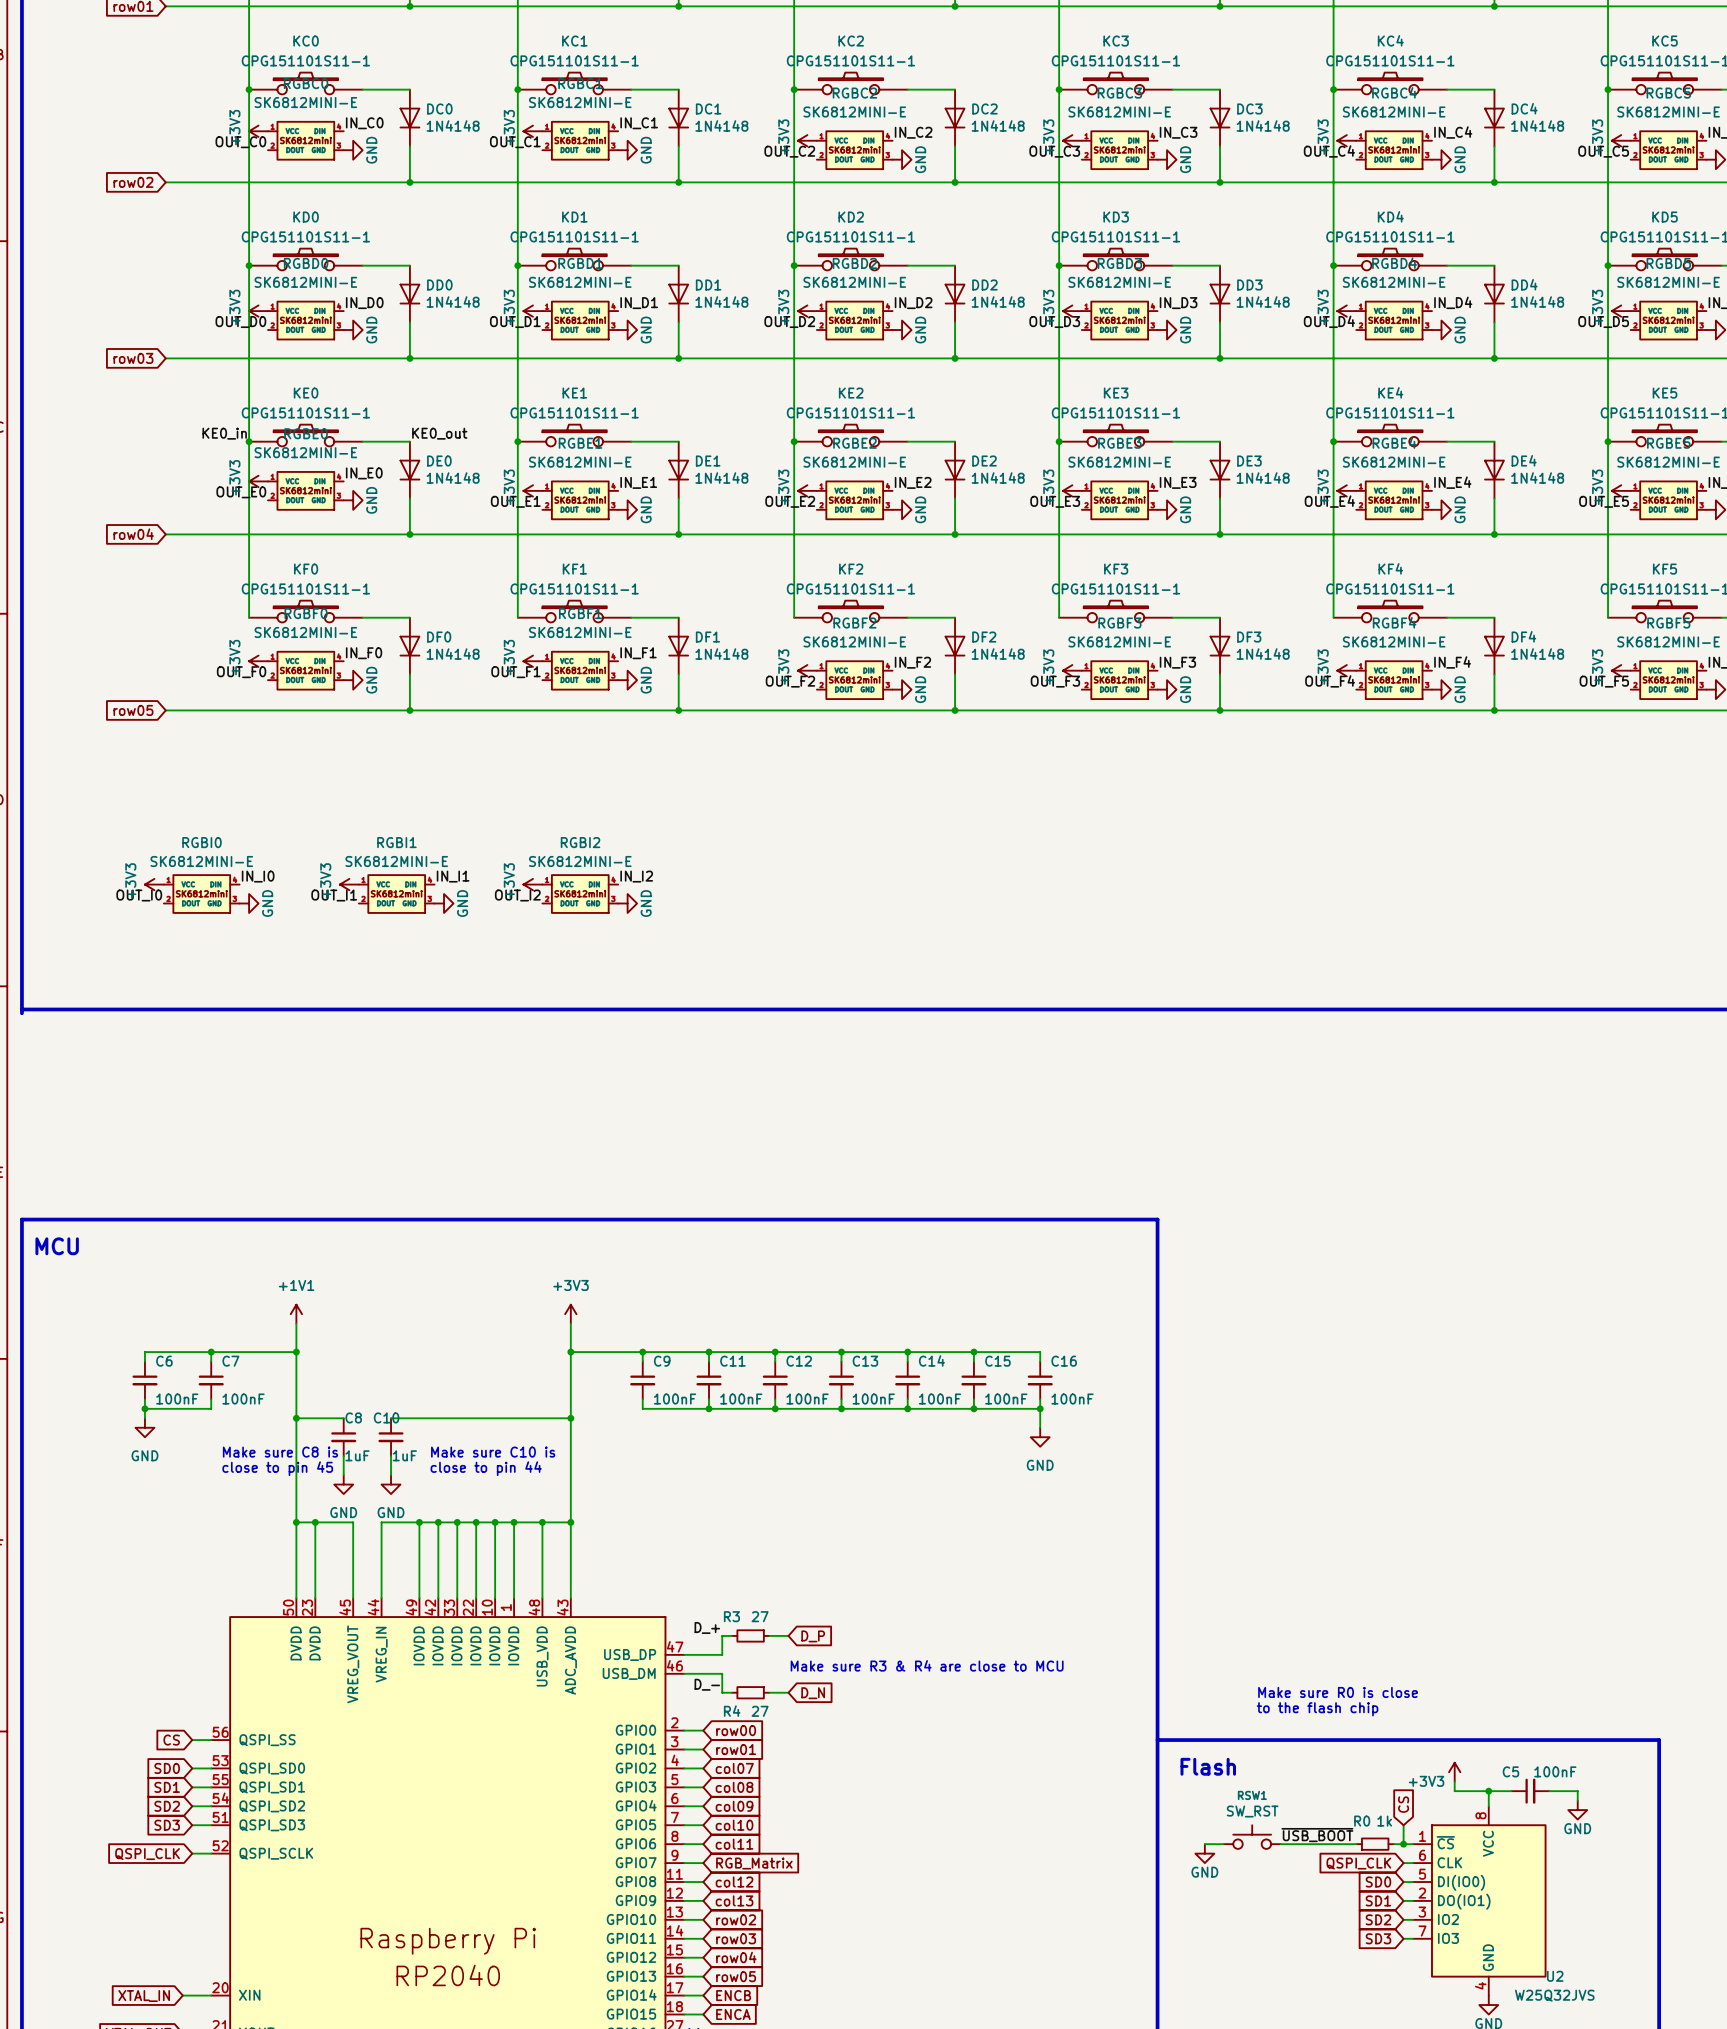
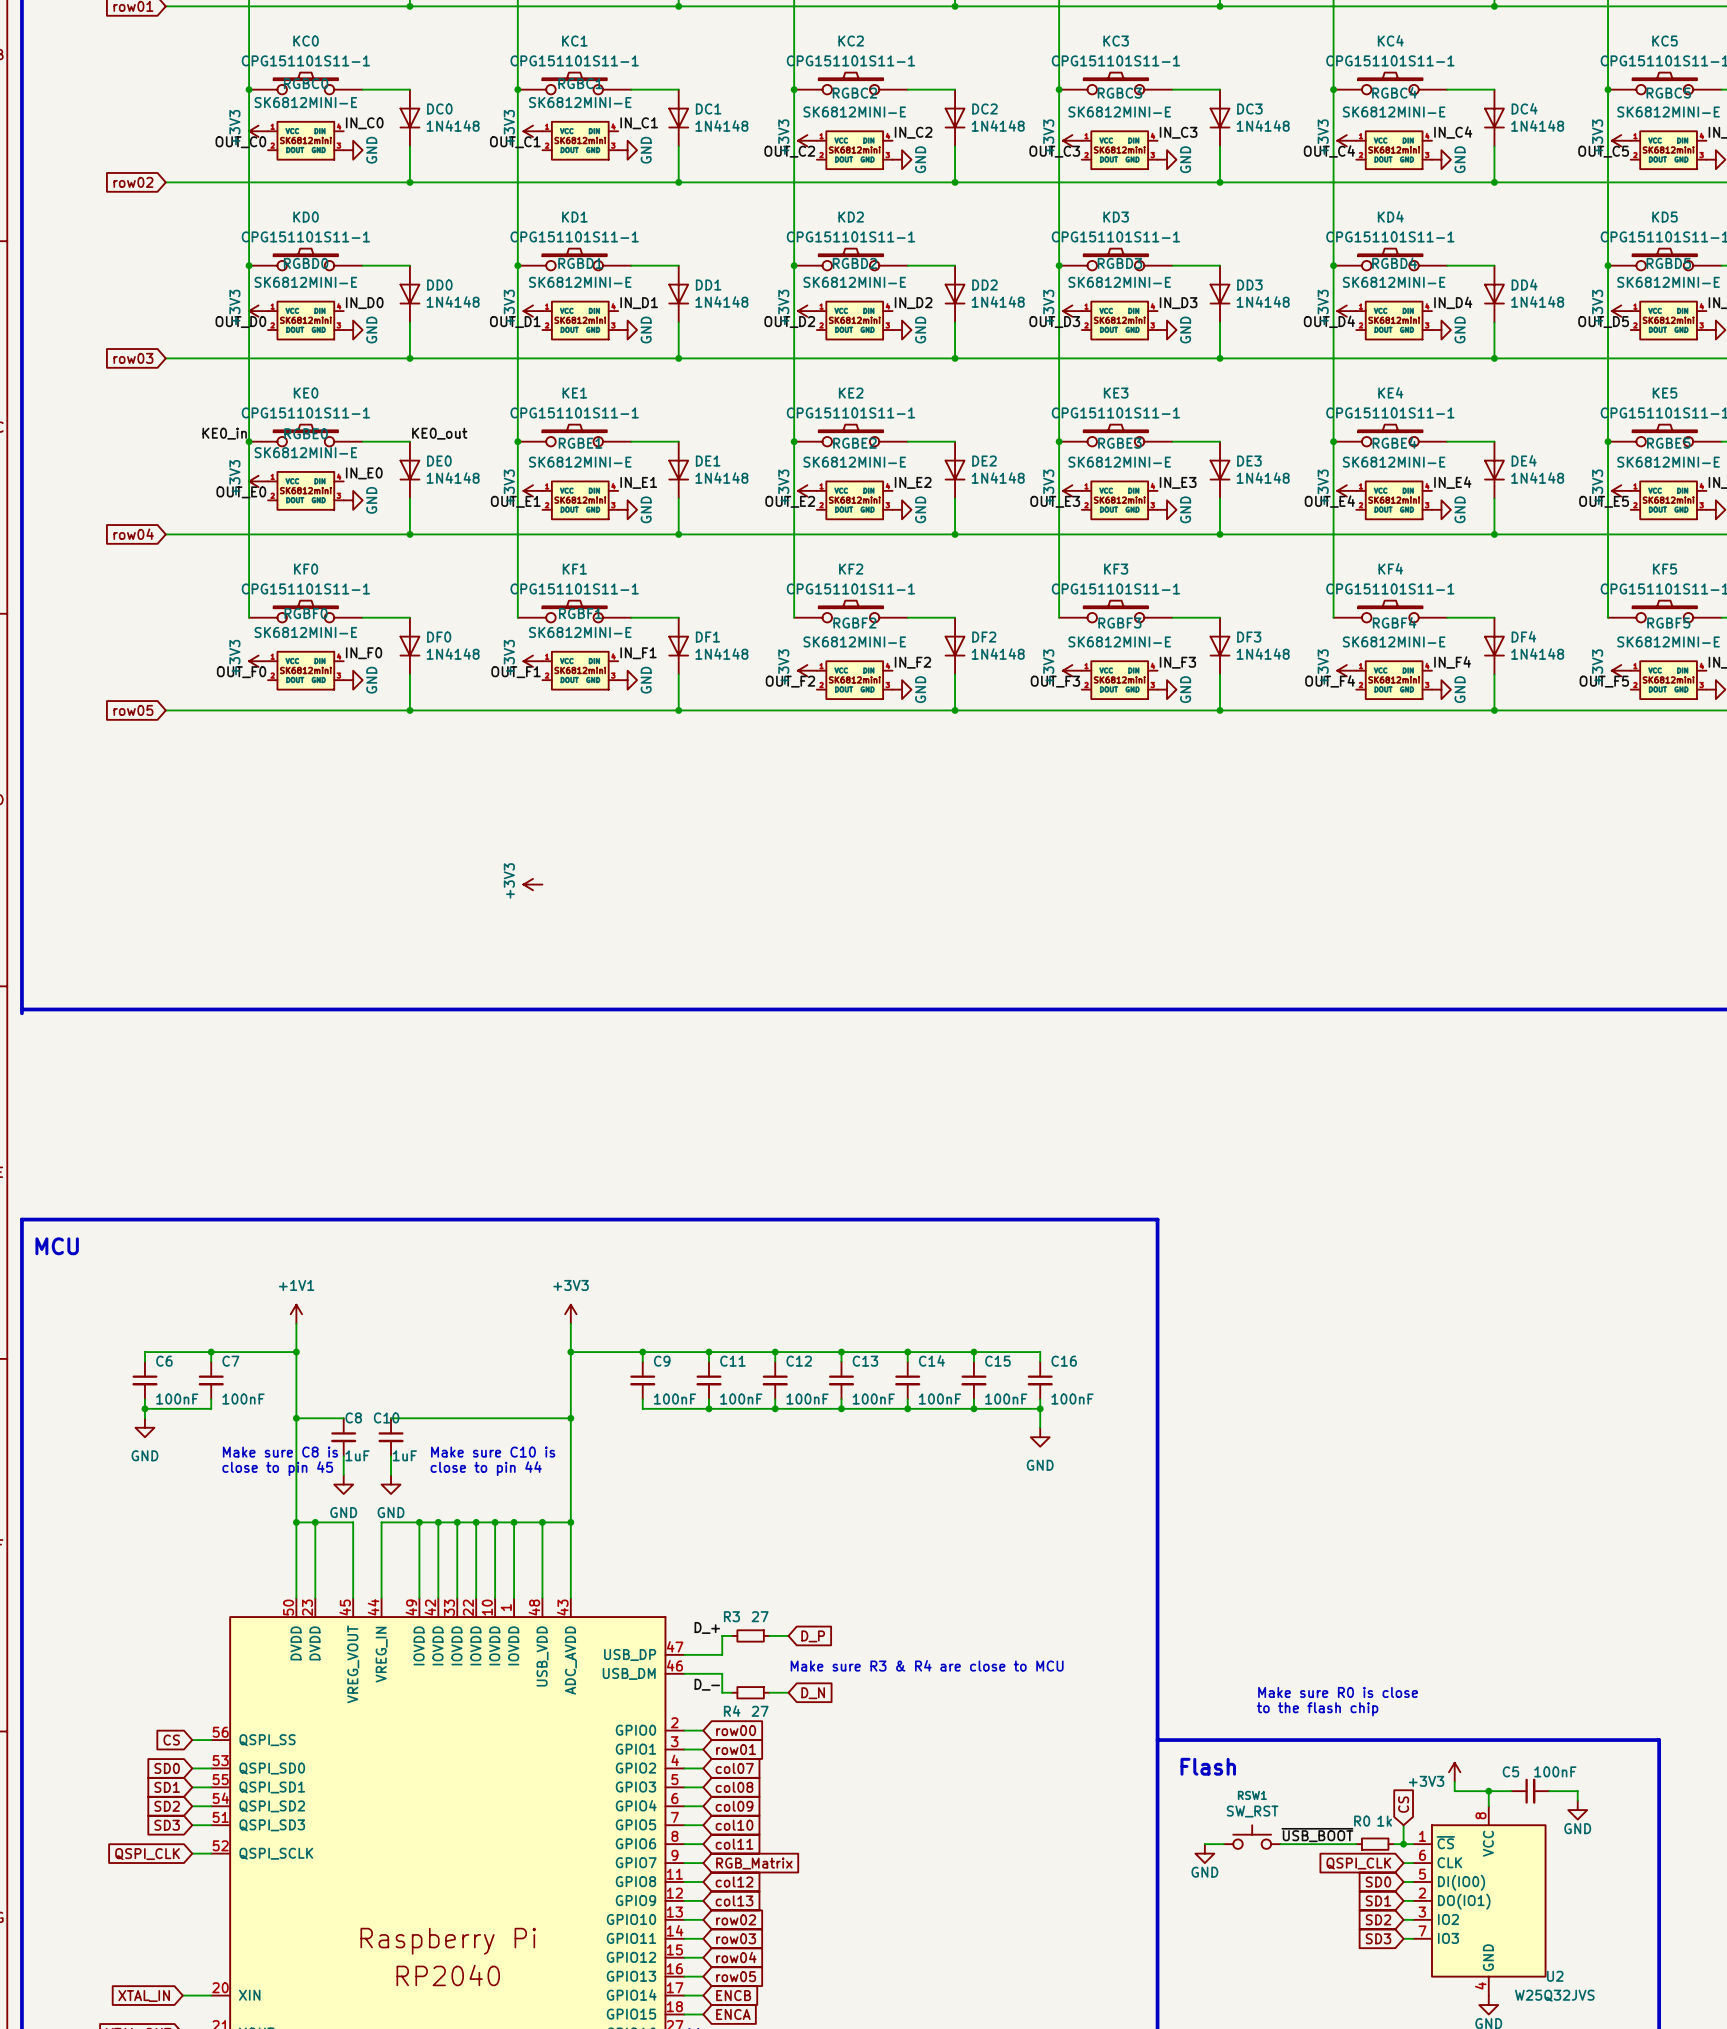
label: IN_I0 (258, 876) -> none
label: IN_I1 (453, 876) -> none
label: IN_I2 (636, 876) -> none
power symbol: +3V3 (154, 884) -> none
power symbol: +3V3 (349, 884) -> none
RGBI0: SK6812MINI-E (201, 894) -> none
RGBI1: SK6812MINI-E (396, 894) -> none
RGBI2: SK6812MINI-E (580, 894) -> none
label: OUT_I0 (139, 895) -> none
label: OUT_I1 (334, 895) -> none
label: OUT_I2 (517, 895) -> none
power symbol: GND (249, 903) -> none
power symbol: GND (444, 903) -> none
power symbol: GND (627, 903) -> none

